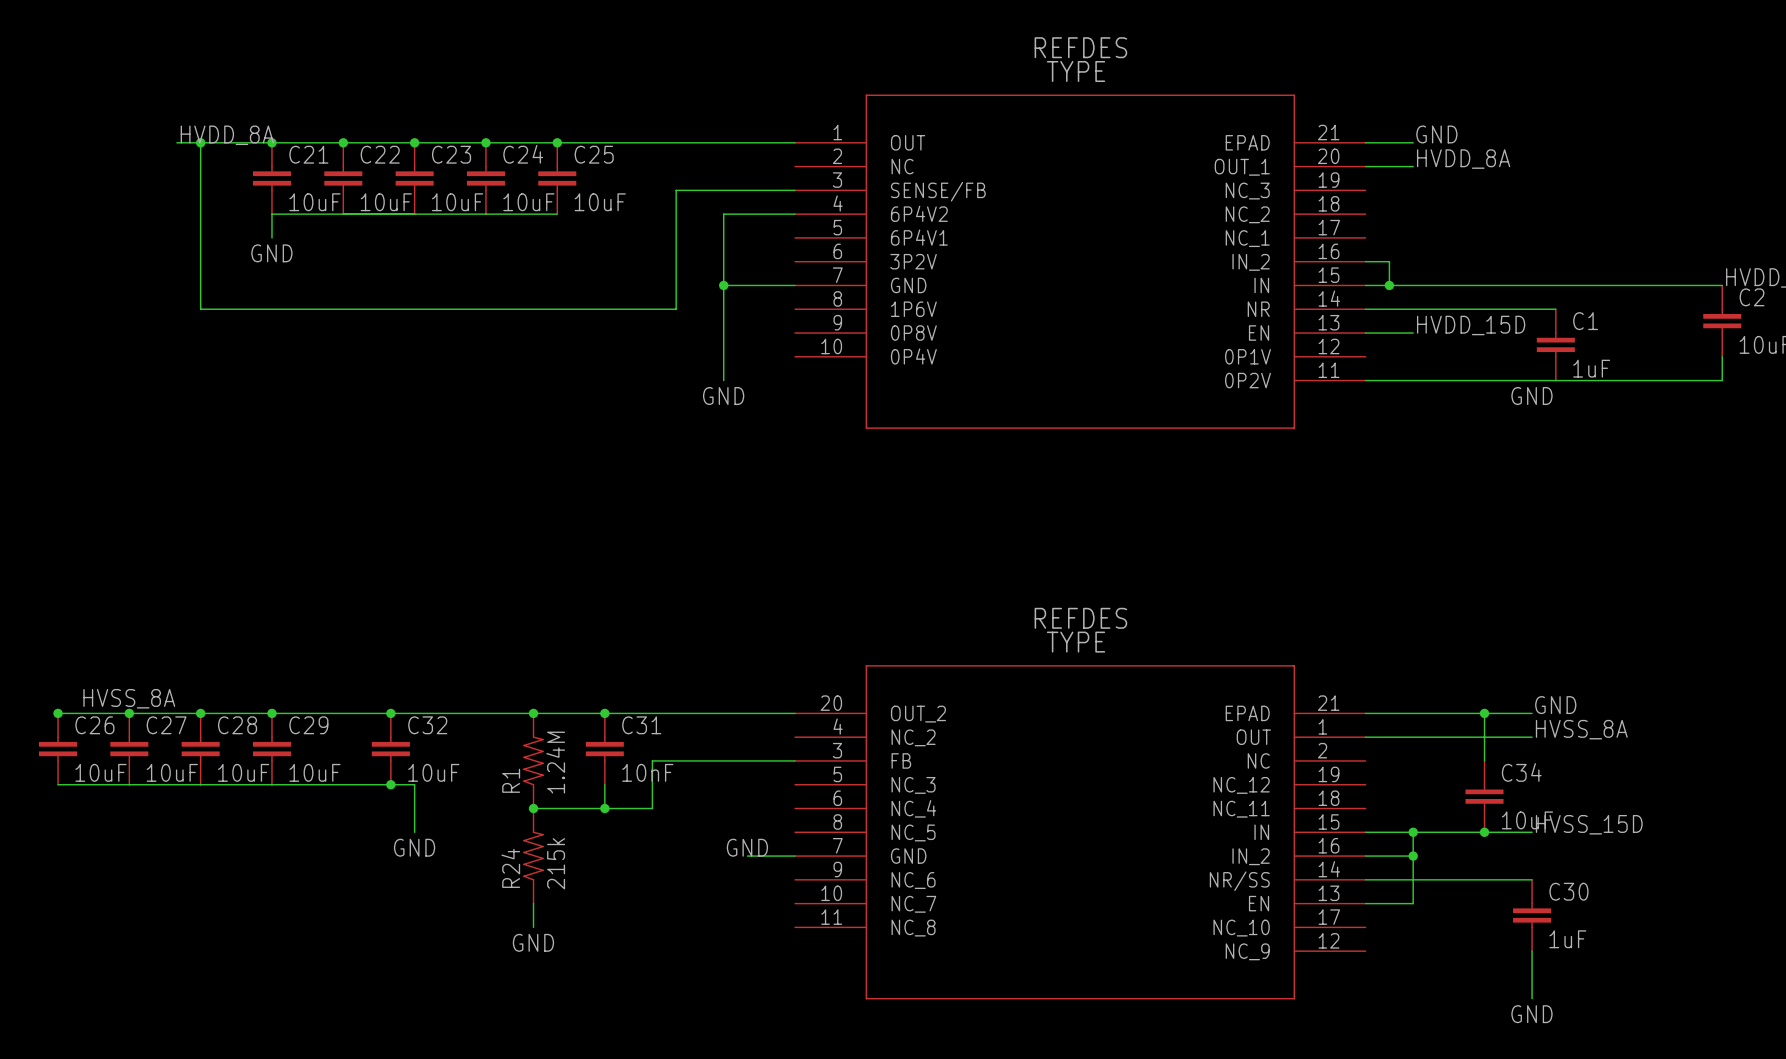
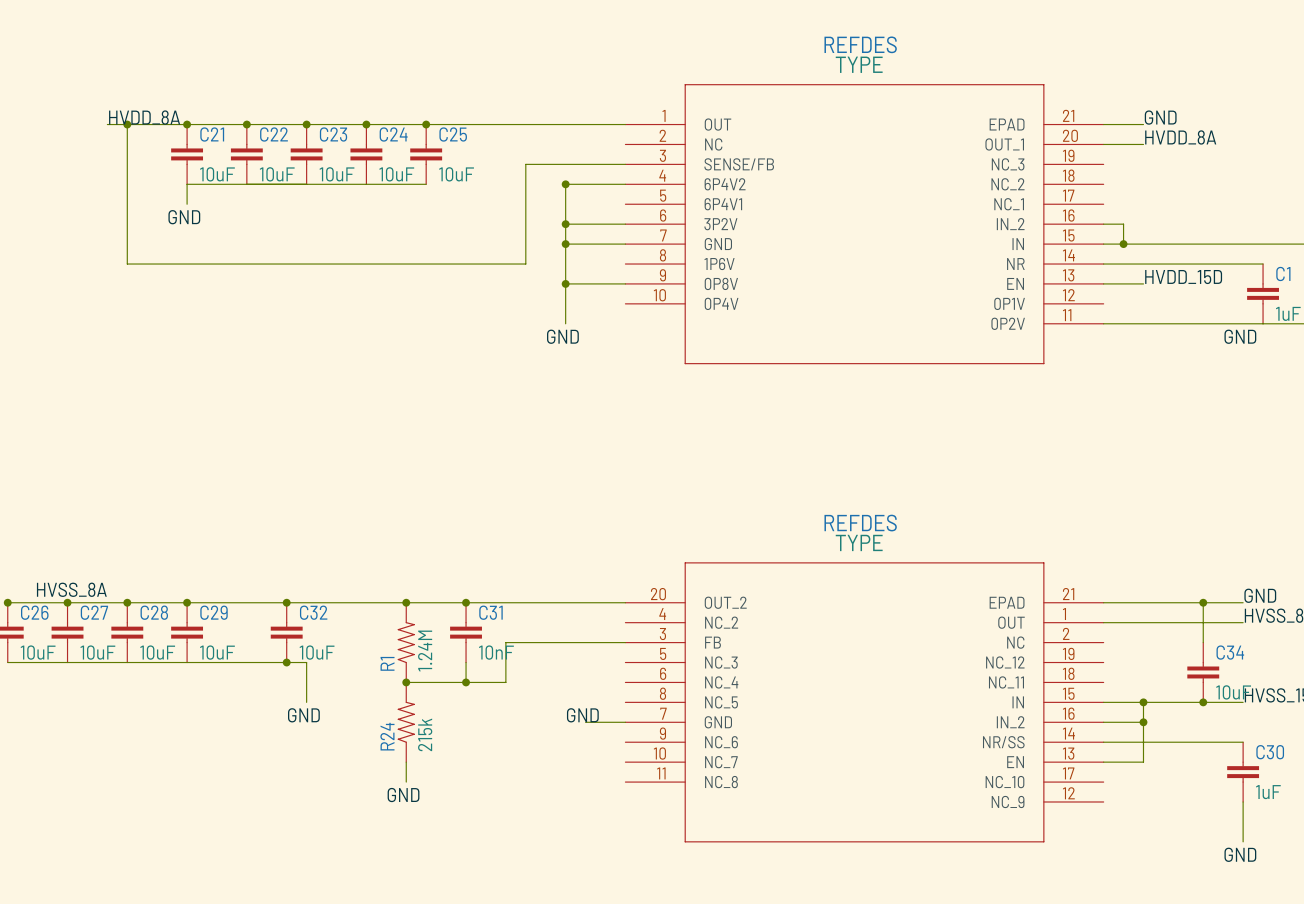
junction: none -> (565, 184)
wire: none -> (565, 224) (625, 224)
junction: none -> (565, 224)
wire: none -> (565, 283) (625, 283)
junction: none -> (565, 283)

